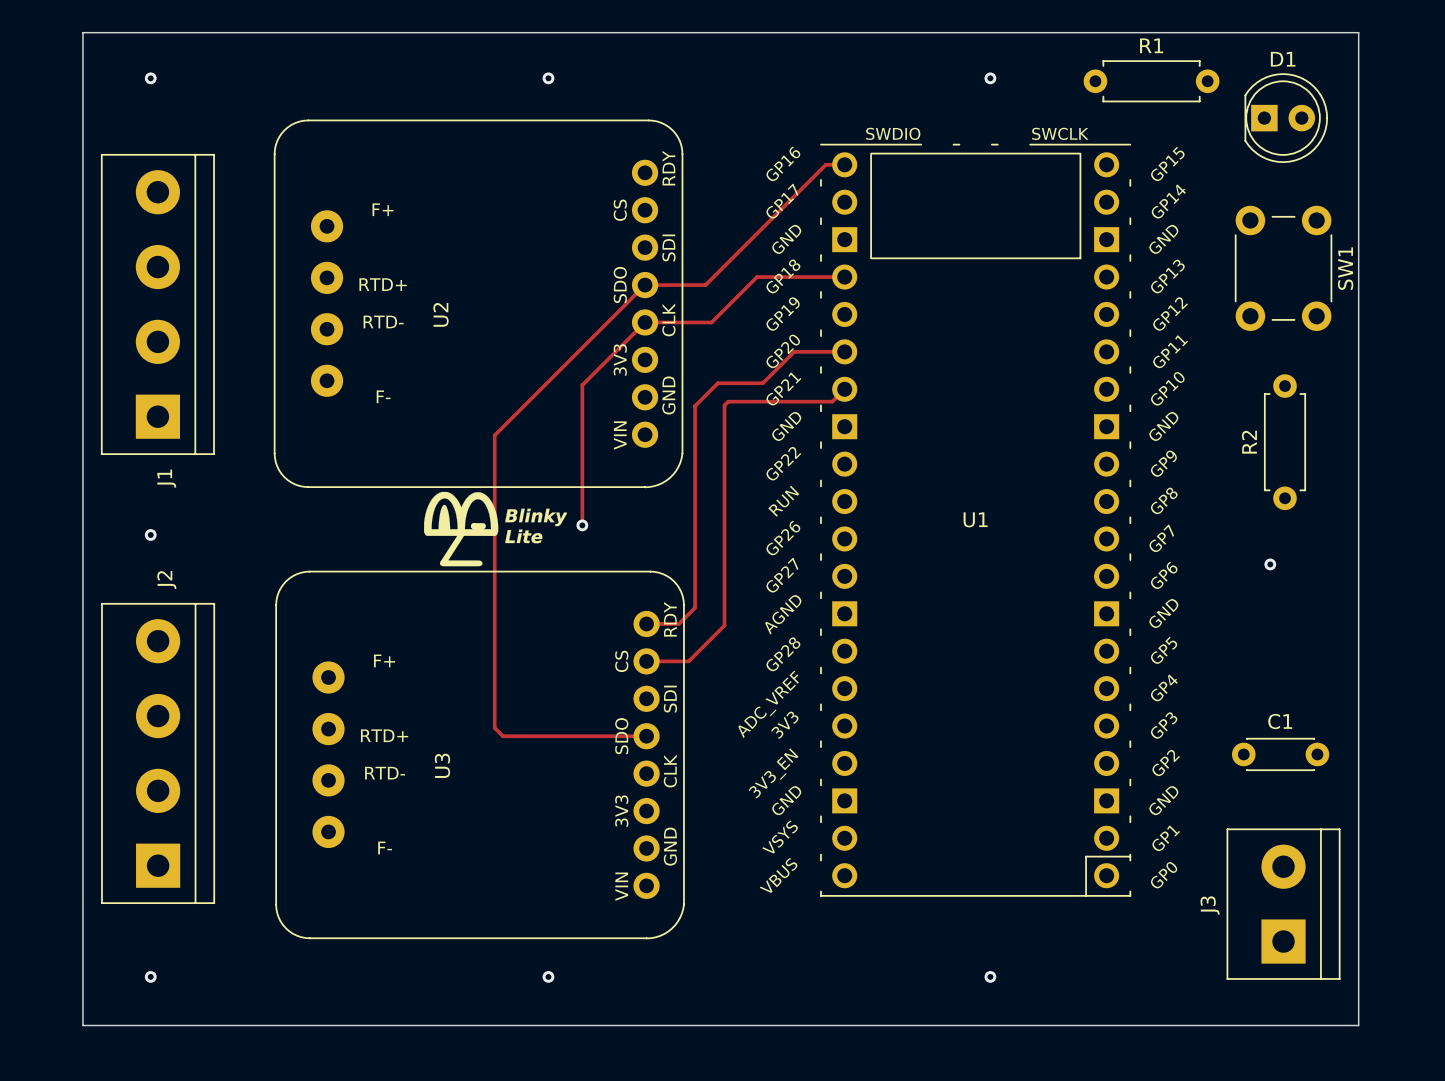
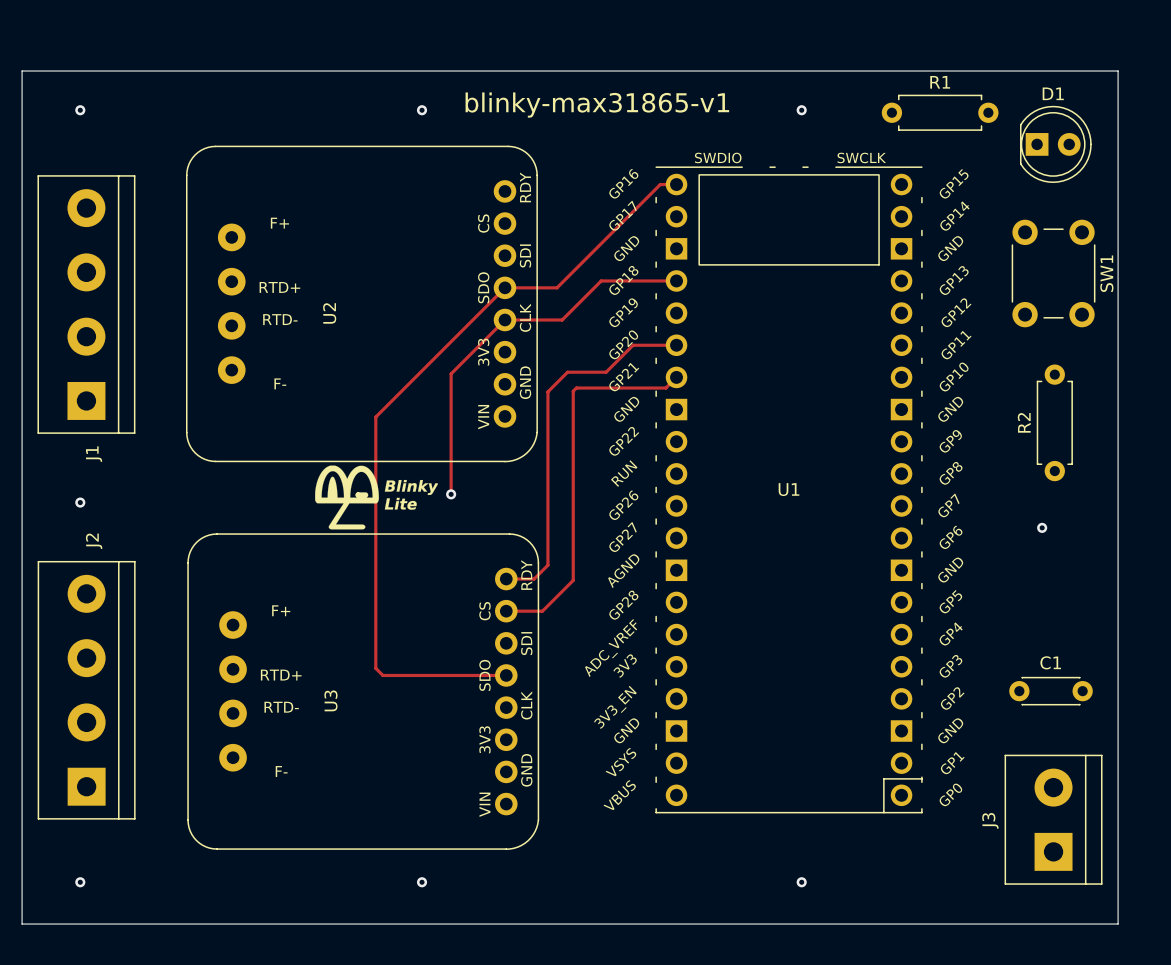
text: none -> blinky-max31865-v1 (597, 105)

